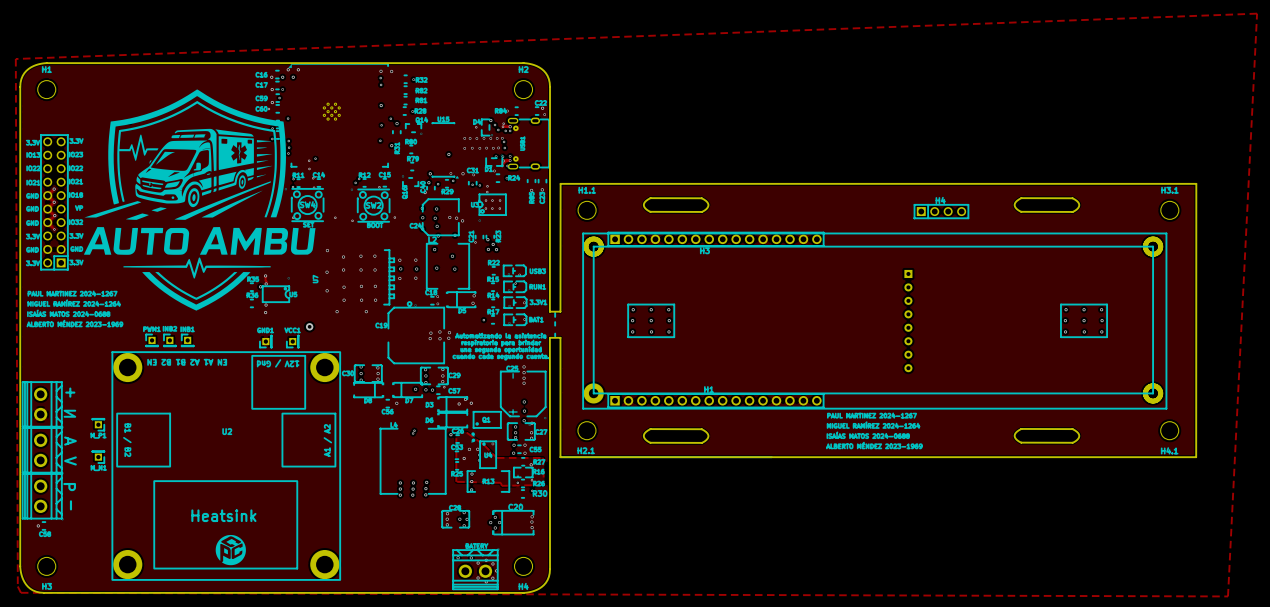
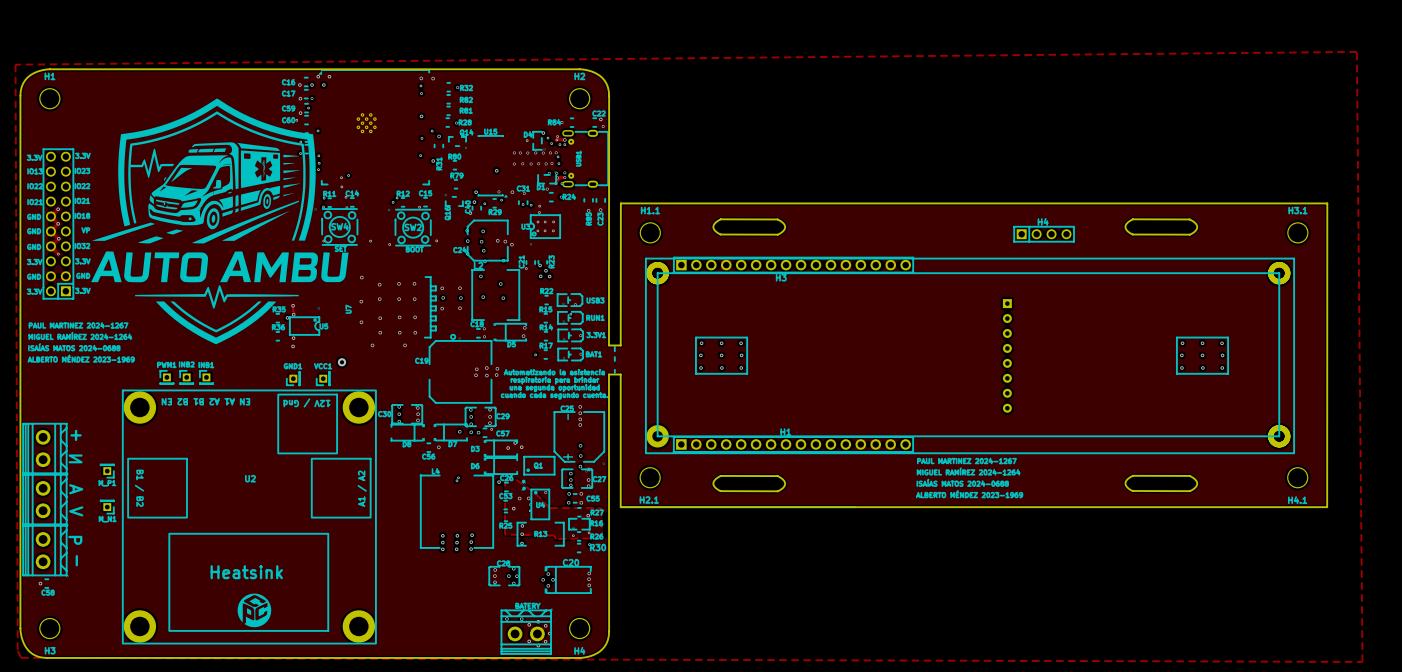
zone outline: (15, 58) (1257, 13) (1228, 596) -> (15, 64) (1356, 51) (1362, 661)

